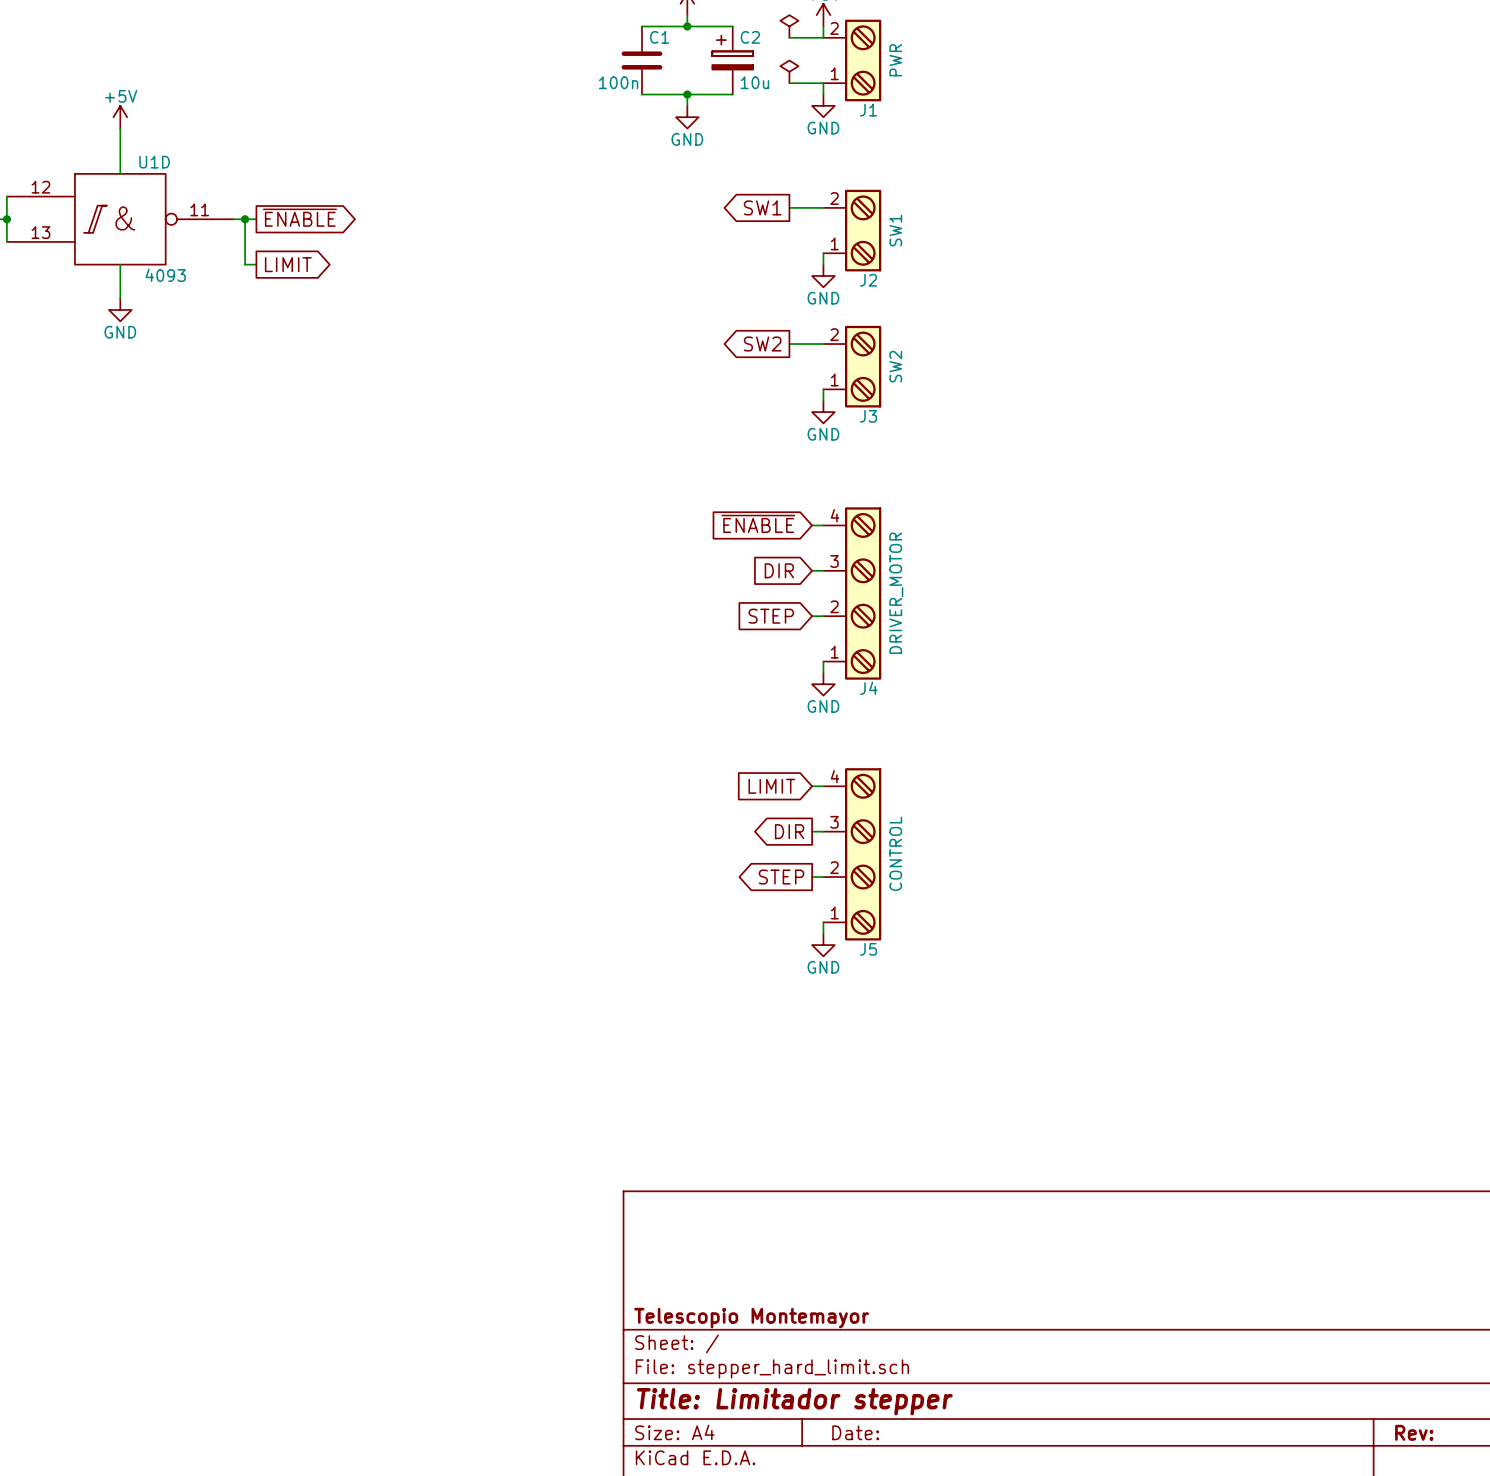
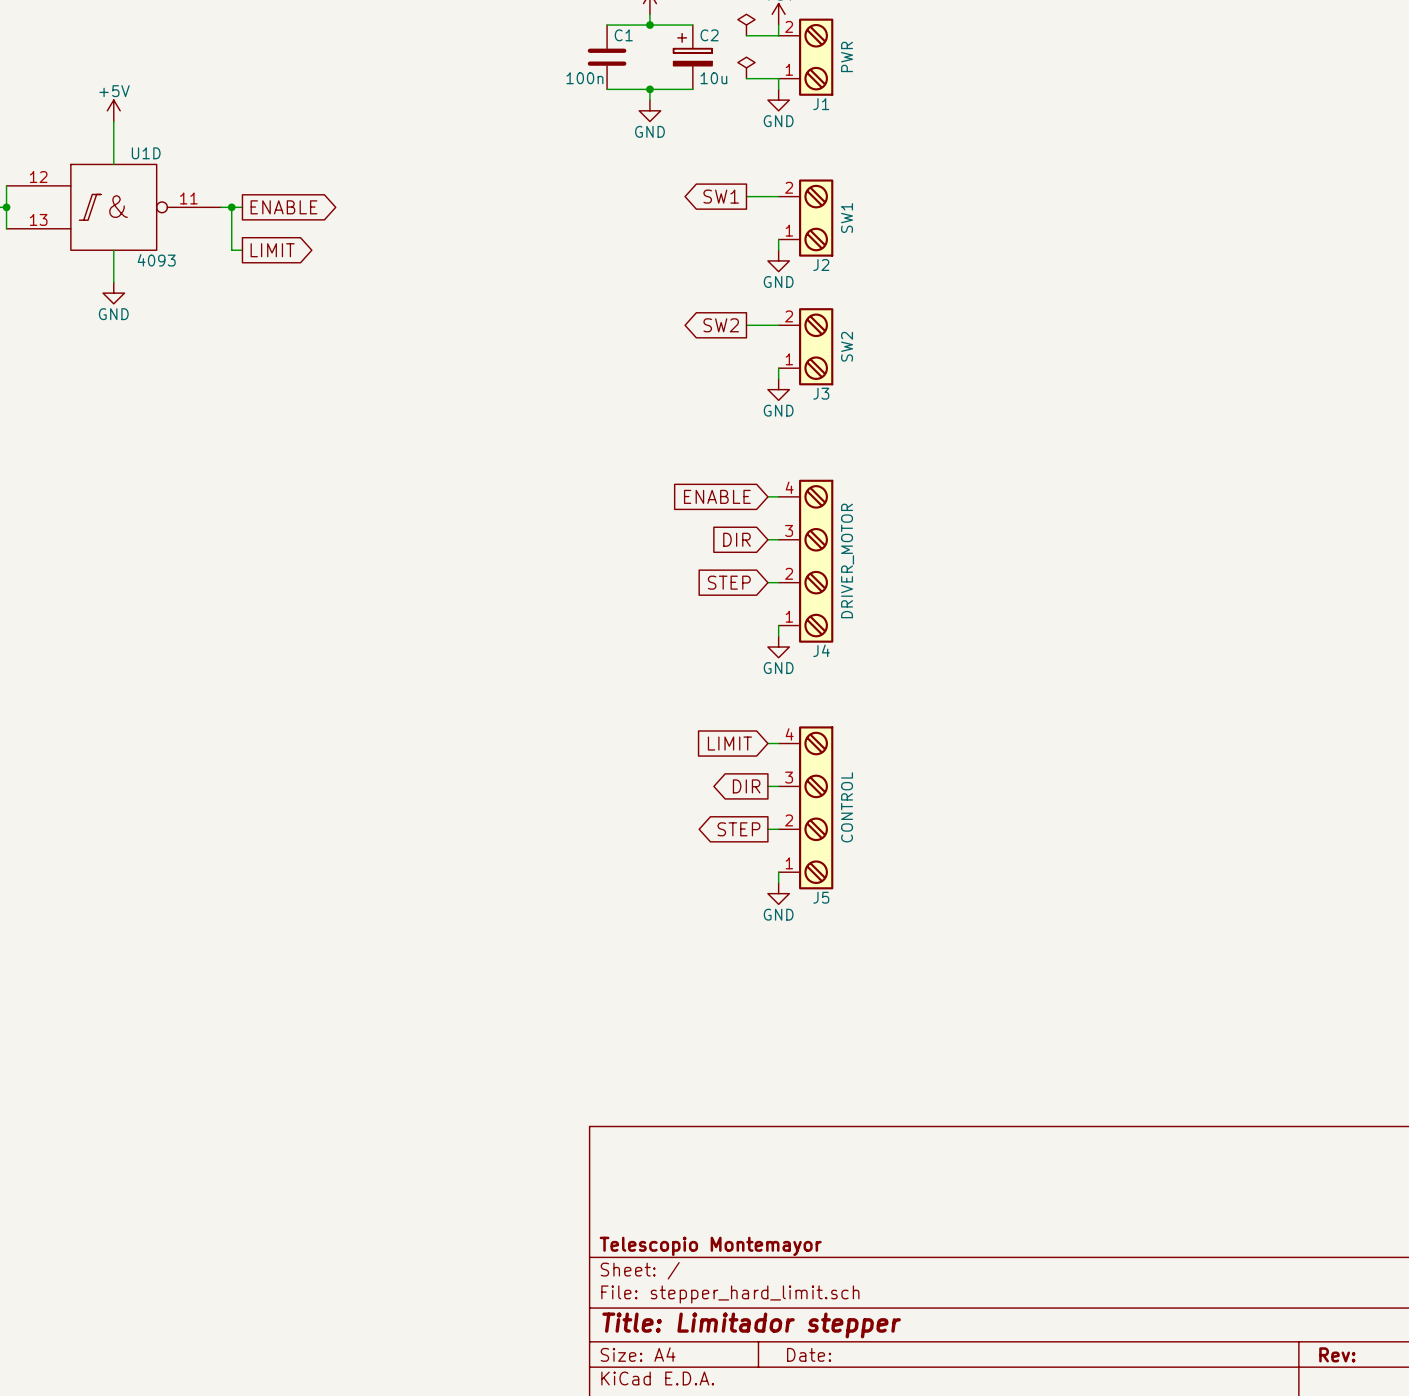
global label: ~{ENABLE} (299, 217) -> ENABLE (283, 207)
global label: ~{ENABLE} (758, 523) -> ENABLE (717, 496)

